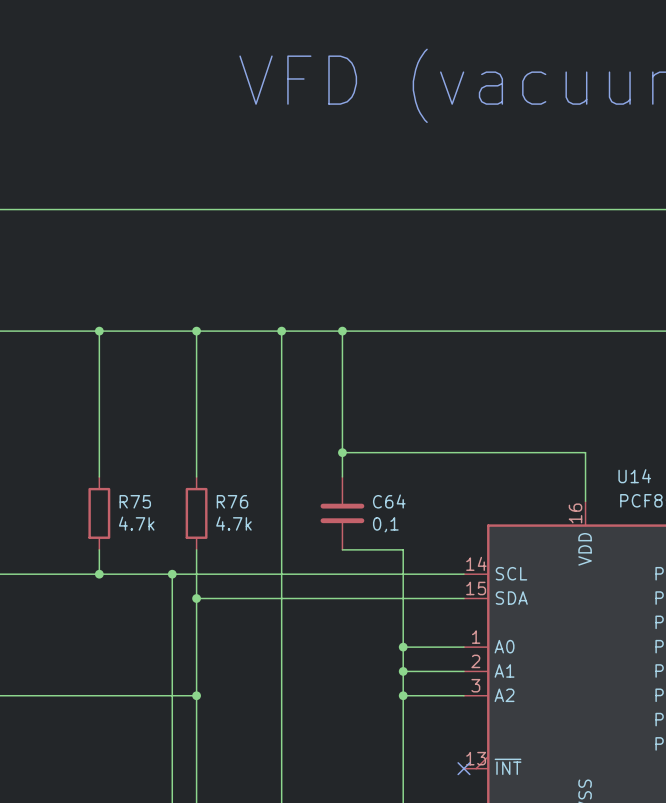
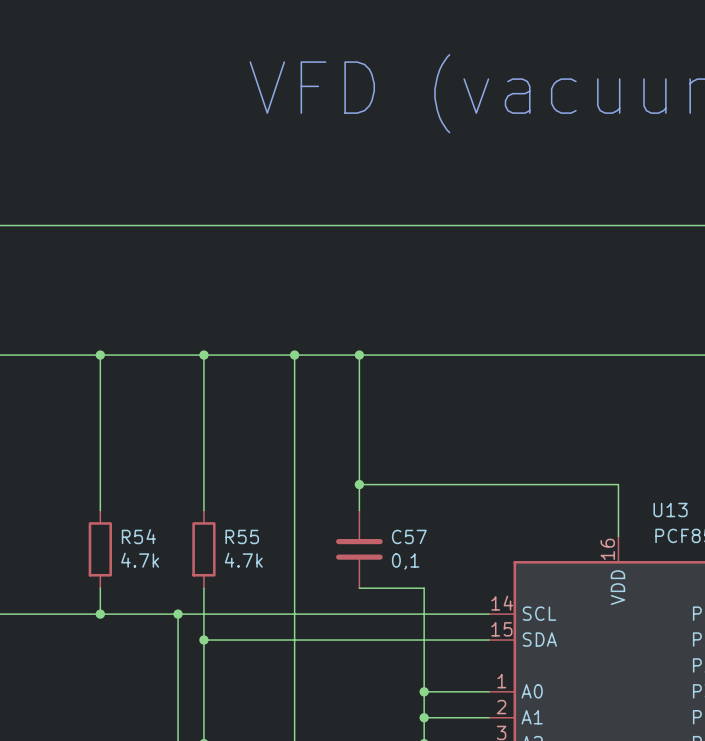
U14 name: U14 (634, 476) -> U13 (670, 510)
R75 name: R75 (135, 501) -> R54 (138, 536)
R76 name: R76 (232, 501) -> R55 (242, 536)
C64 name: C64 (389, 501) -> C57 (409, 536)

